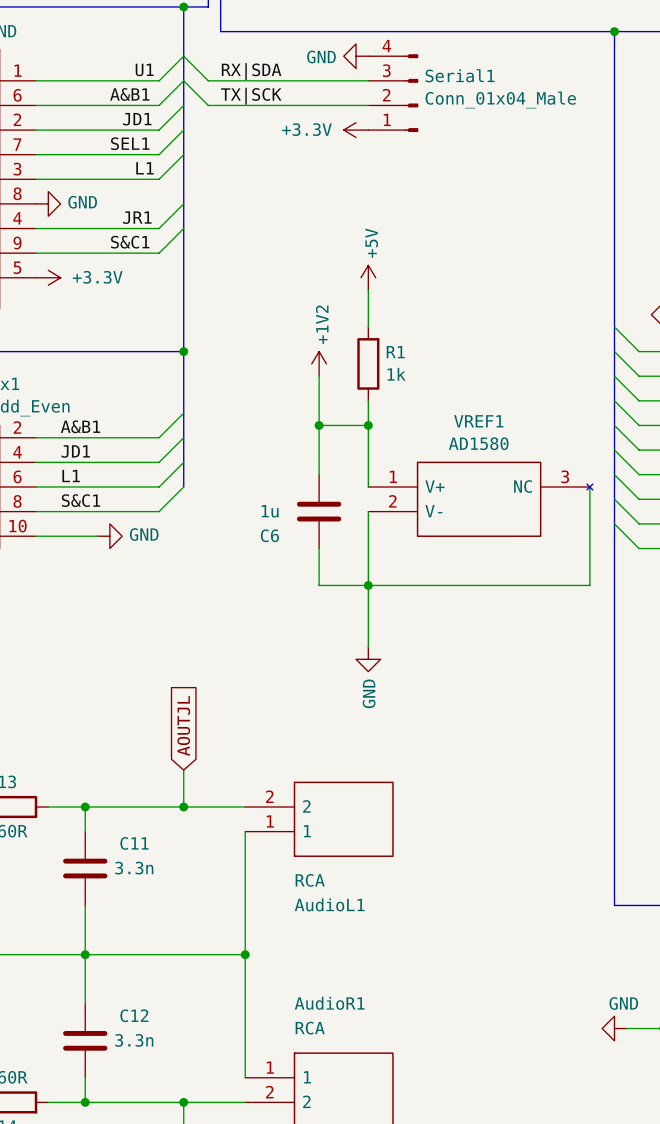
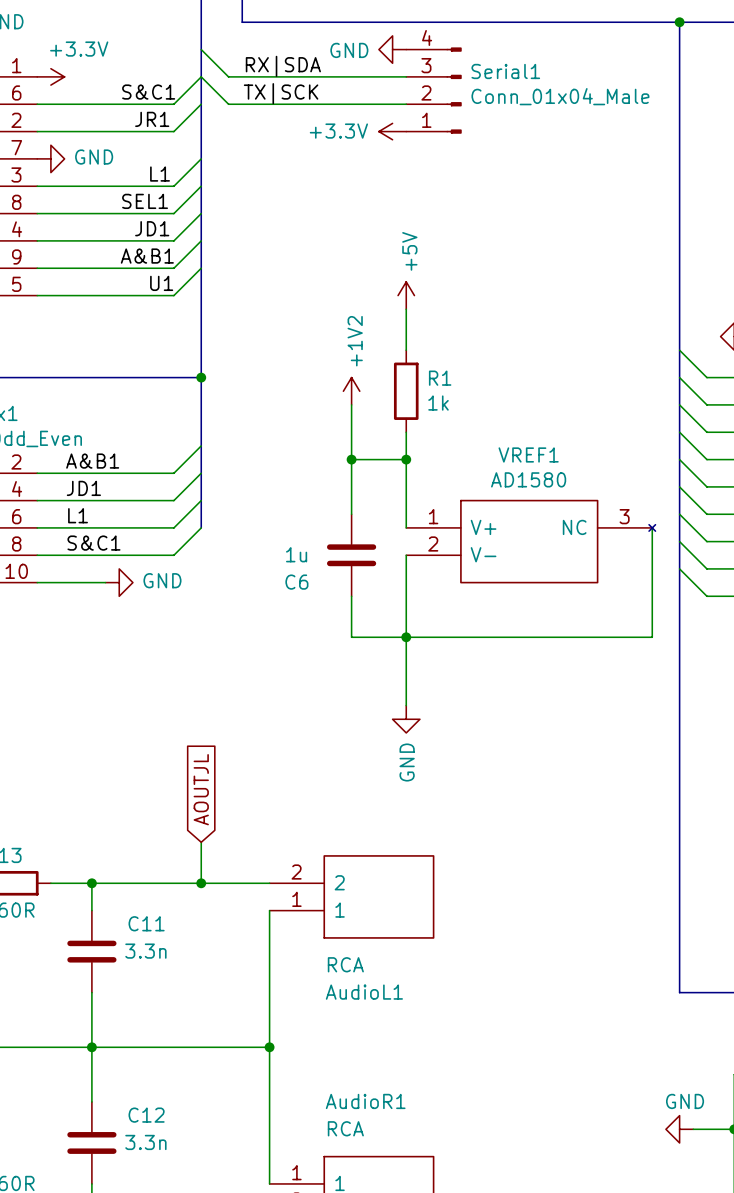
wire: (183, 56) (159, 80) (36, 80) -> (201, 268) (173, 295) (37, 295)
label position: U1 (144, 69) -> U1 (161, 283)
label: A&B1 (129, 94) -> S&C1 (148, 92)
label: JD1 (137, 119) -> JR1 (152, 119)
wire: (183, 130) (159, 154) (36, 154) -> (201, 186) (173, 213) (37, 213)
label position: SEL1 (130, 143) -> SEL1 (145, 201)
power symbol position: GND (48, 203) -> GND (50, 158)
label: JR1 (137, 217) -> JD1 (152, 228)
label: S&C1 (130, 242) -> A&B1 (147, 256)
power symbol position: +3.3V (48, 277) -> +3.3V (50, 76)
power symbol text position: +3.3V (97, 277) -> +3.3V (79, 49)

